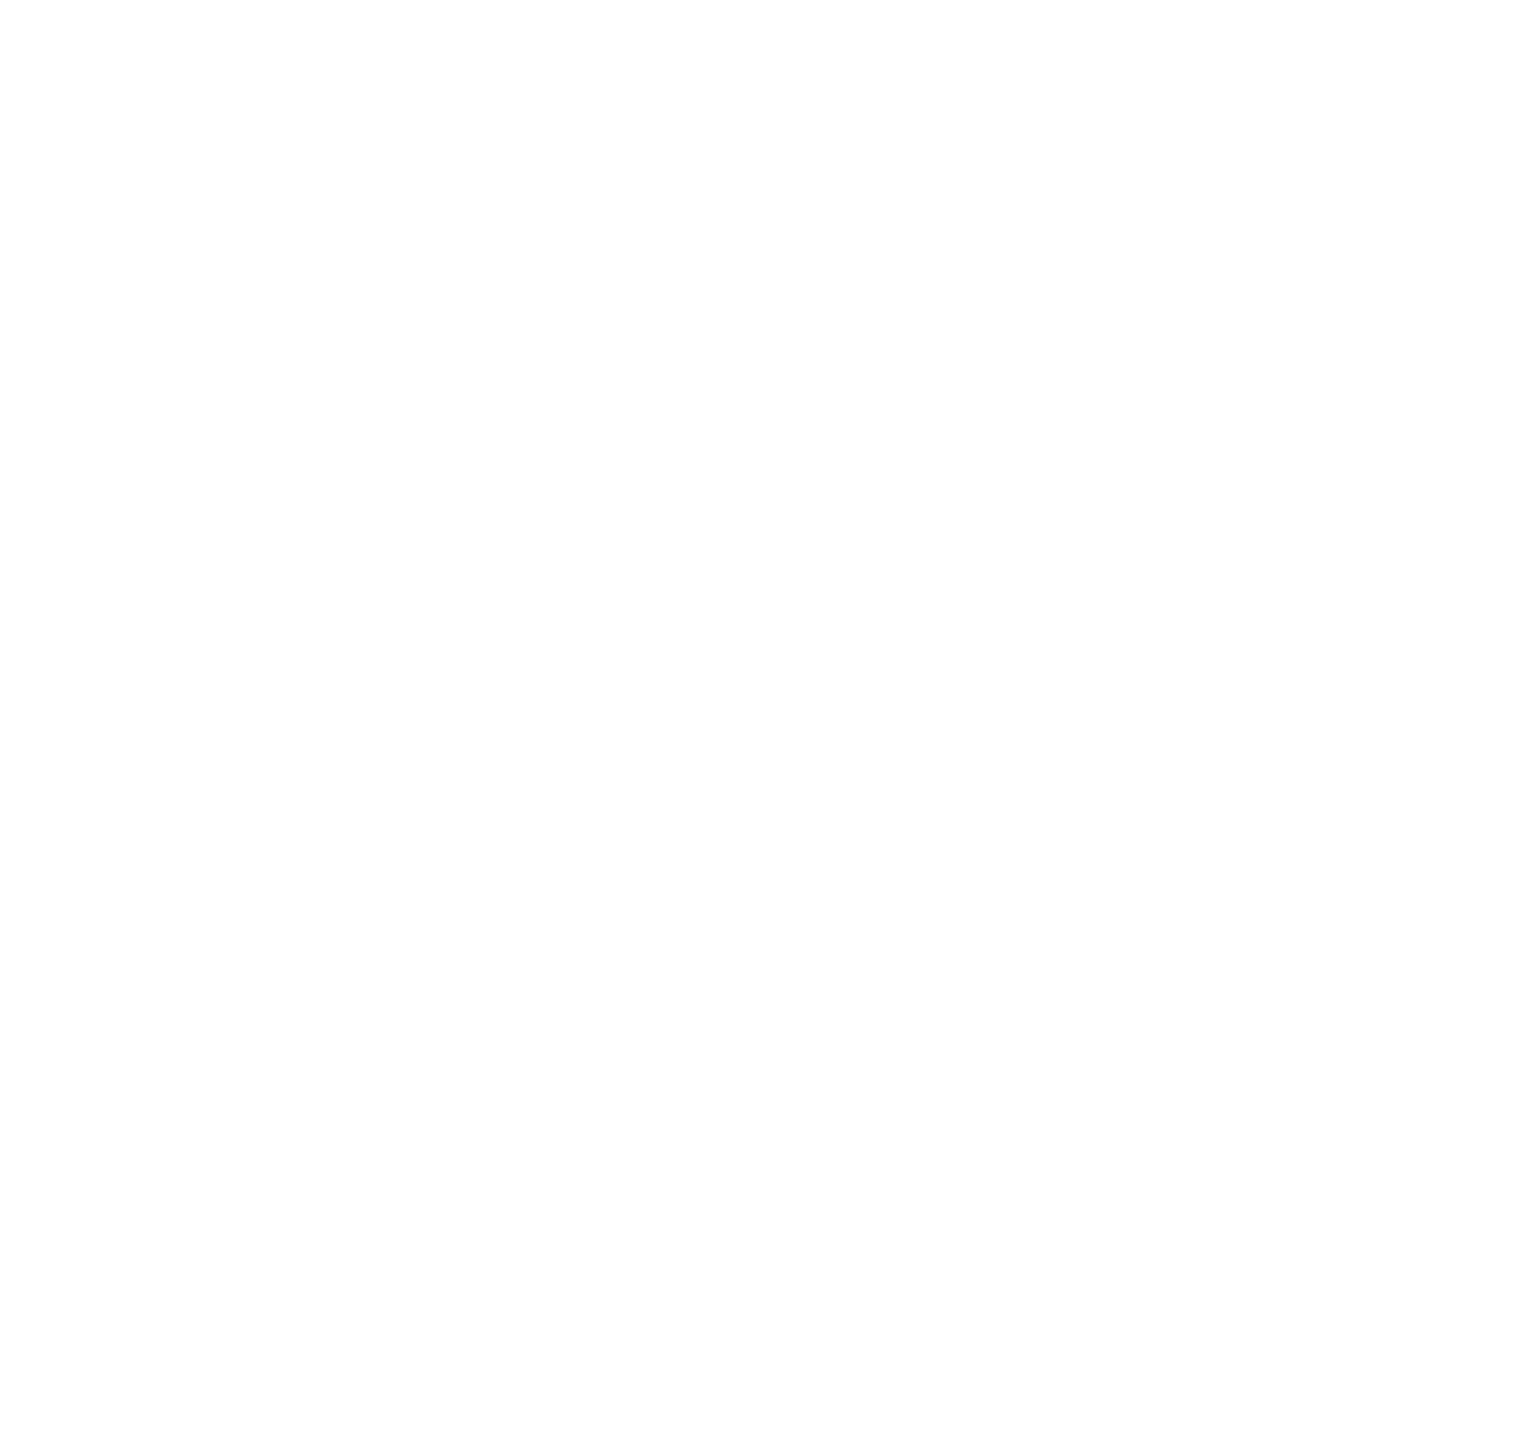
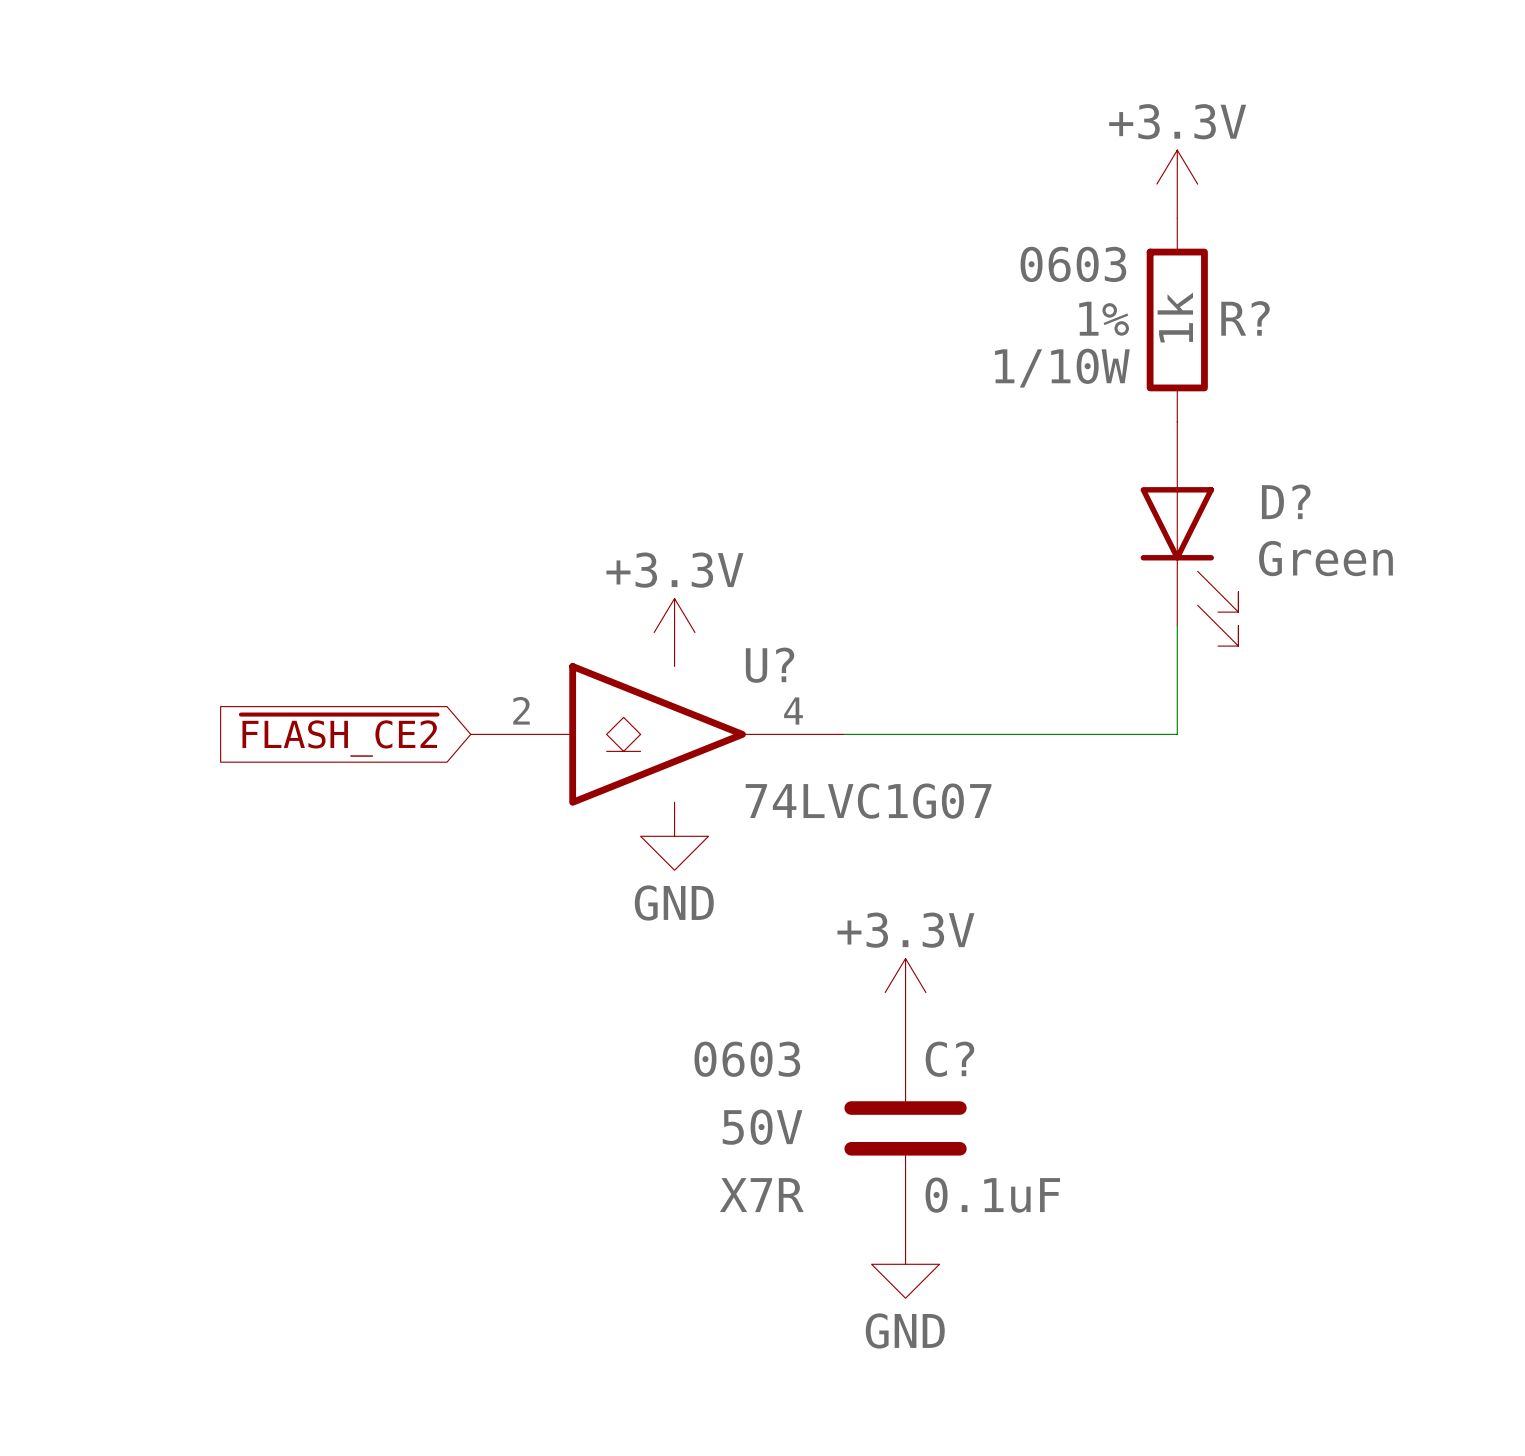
power symbol: none -> +3.3V (1177, 184)
R?: none -> 1k (1177, 319)
D?: none -> Green (1189, 533)
wire: none -> (1177, 625) (1177, 734) (844, 734)
power symbol: none -> +3.3V (674, 632)
global label: none -> ~{FLASH_CE2} (339, 735)
U?: none -> 74LVC1G07 (657, 734)
power symbol: none -> GND (674, 836)
power symbol: none -> +3.3V (905, 992)
C?: none -> 0.1uF (905, 1128)
power symbol: none -> GND (905, 1264)

